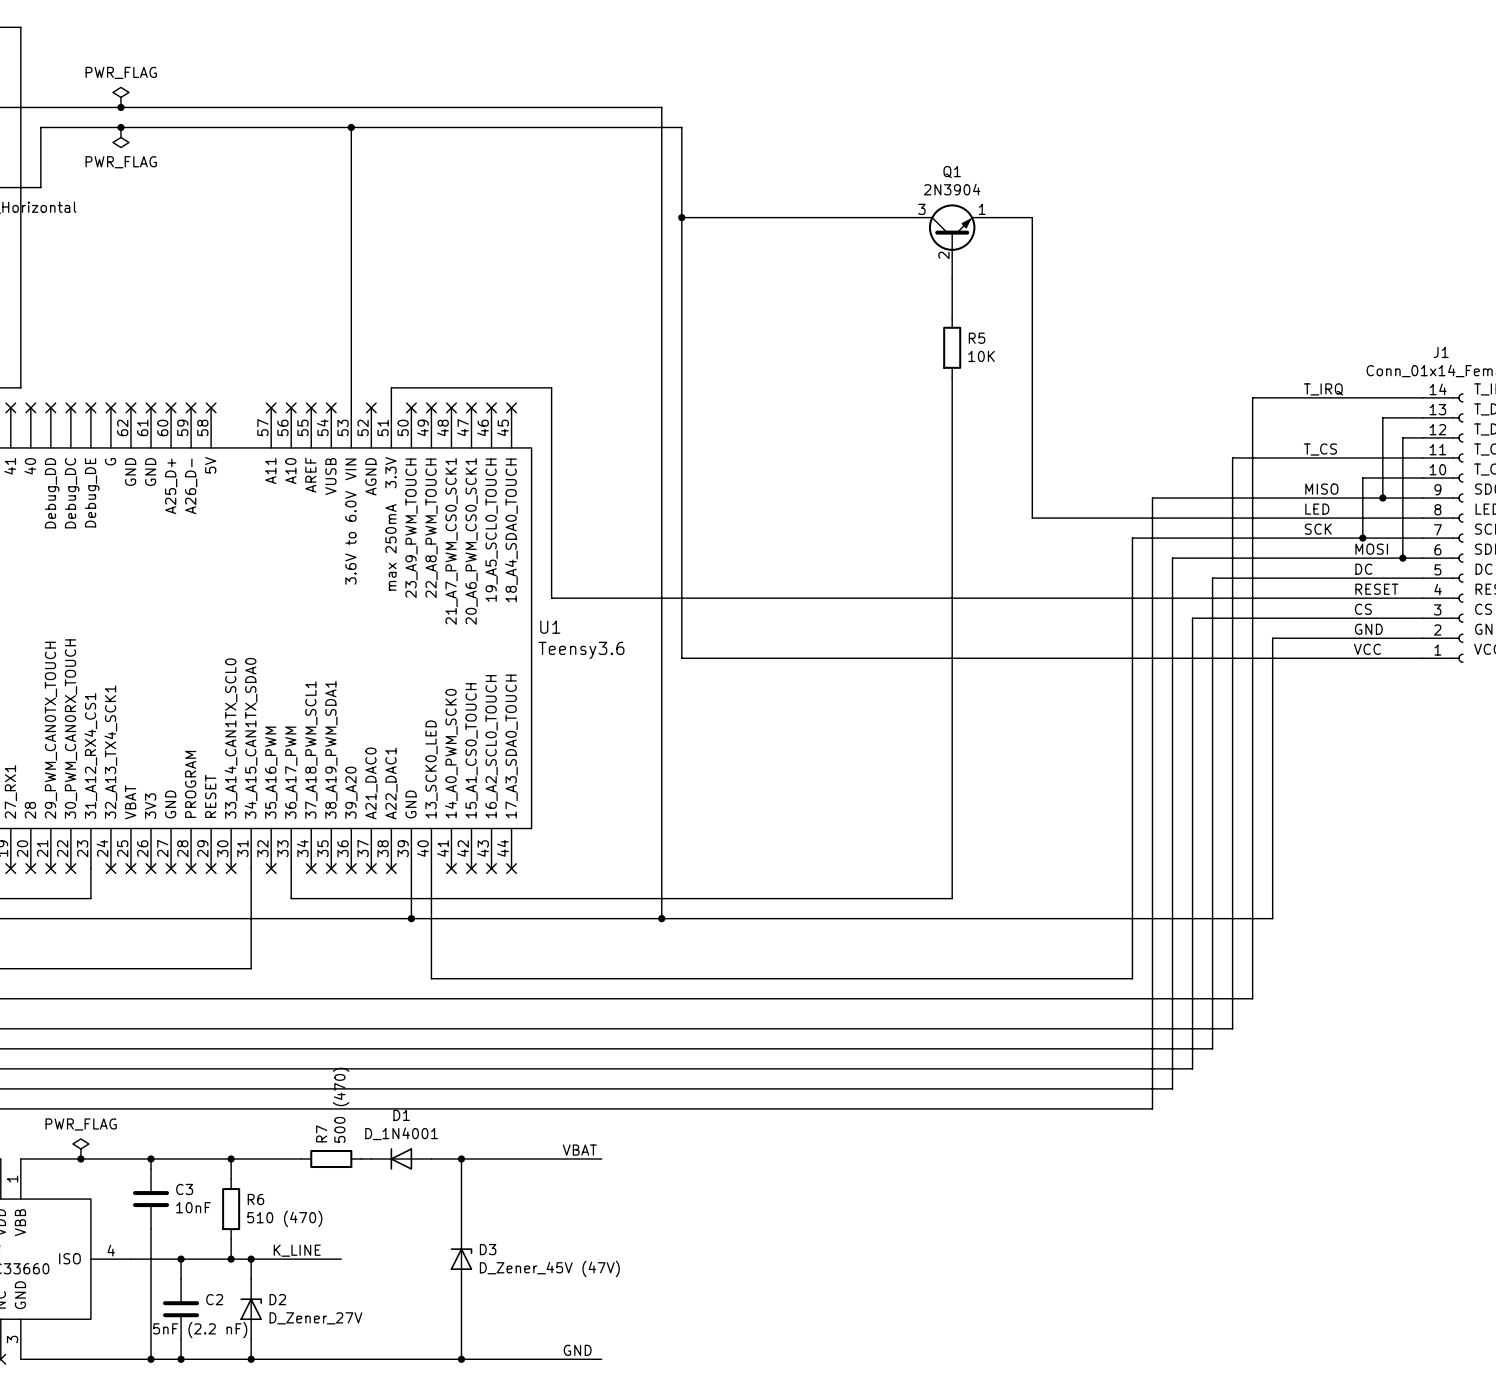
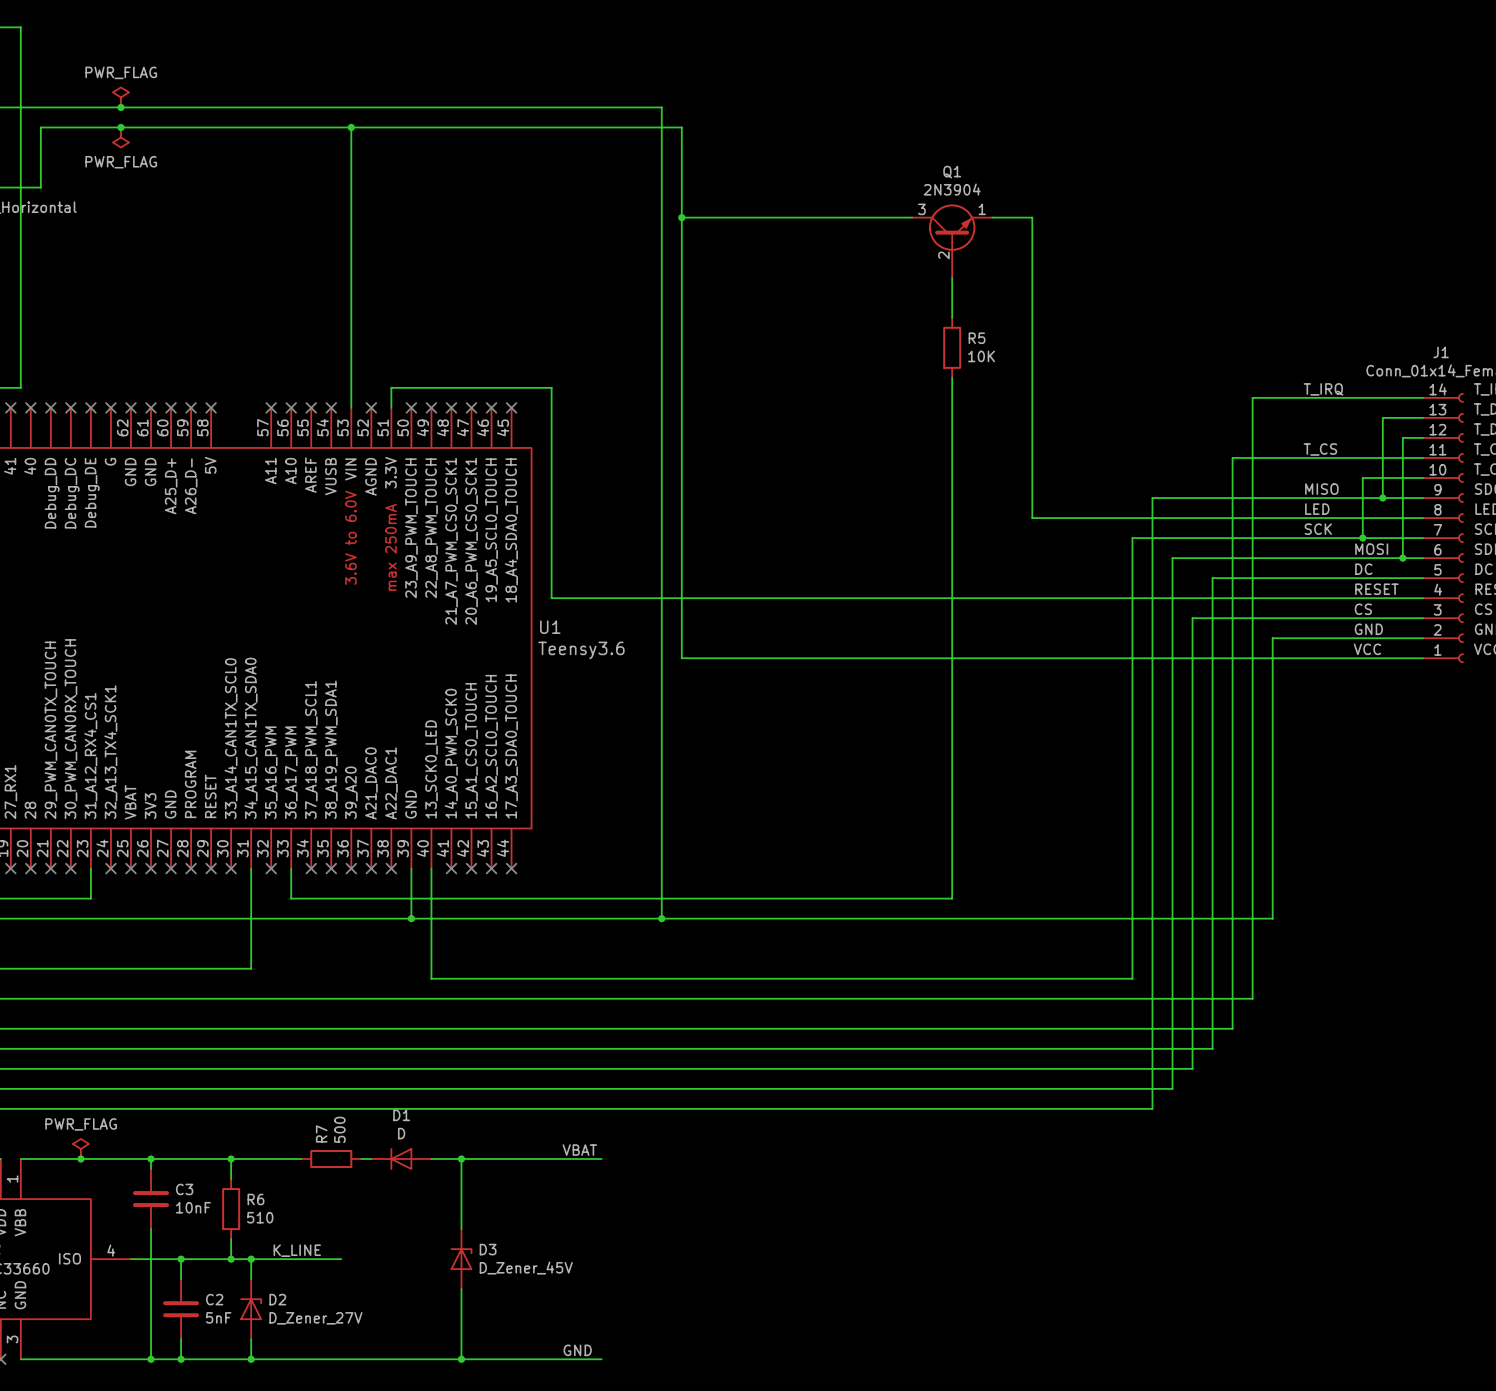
R7 value: 500 (470) (341, 1105) -> 500 (339, 1129)
D1 value: D_1N4001 (401, 1133) -> D (401, 1133)
R6 value: 510 (470) (284, 1218) -> 510 (260, 1217)
D3 value: D_Zener_45V (47V) (549, 1268) -> D_Zener_45V (526, 1268)
C2 value: 5nF (2.2 nF) (200, 1330) -> 5nF (218, 1317)

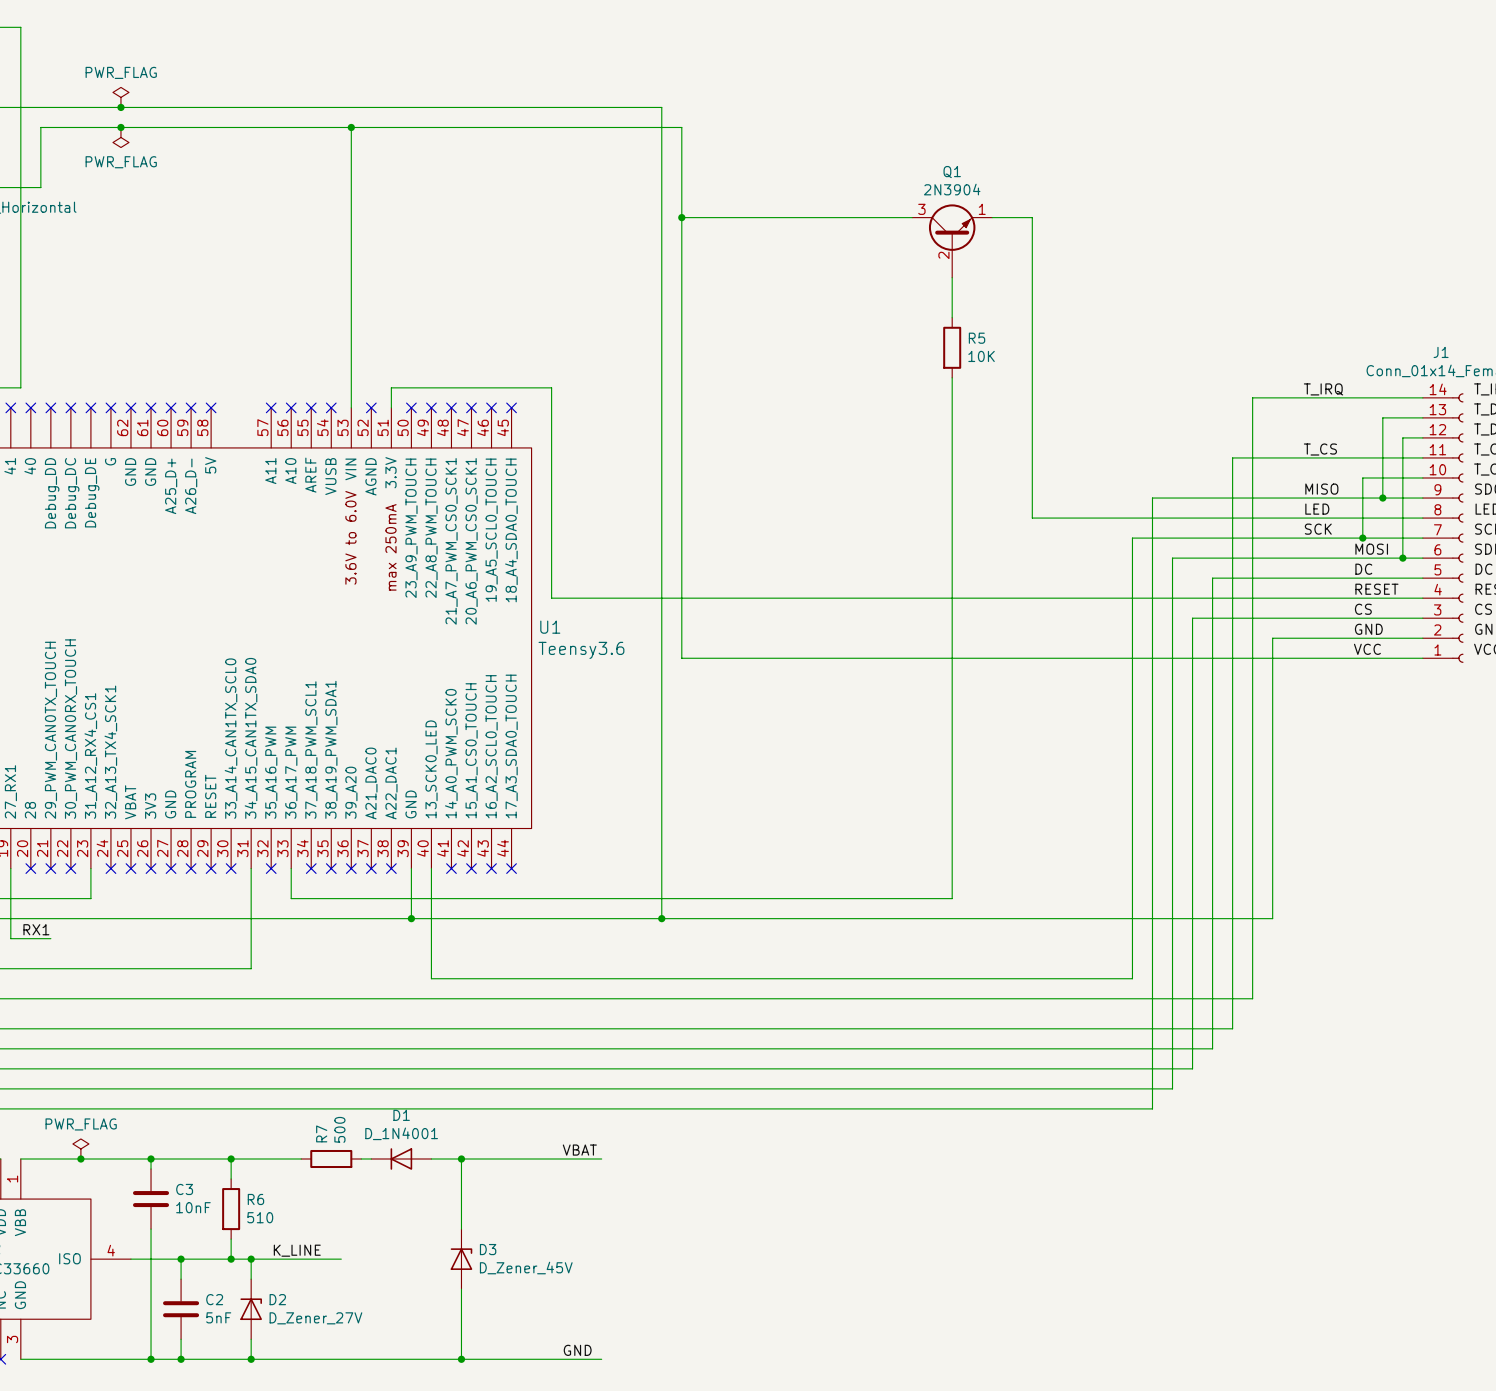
wire: none -> (10, 868) (10, 938) (50, 938)
no-connect mark: (10, 868) -> none
label: none -> RX1 (36, 929)
D1 value: D (401, 1133) -> D_1N4001 (401, 1133)

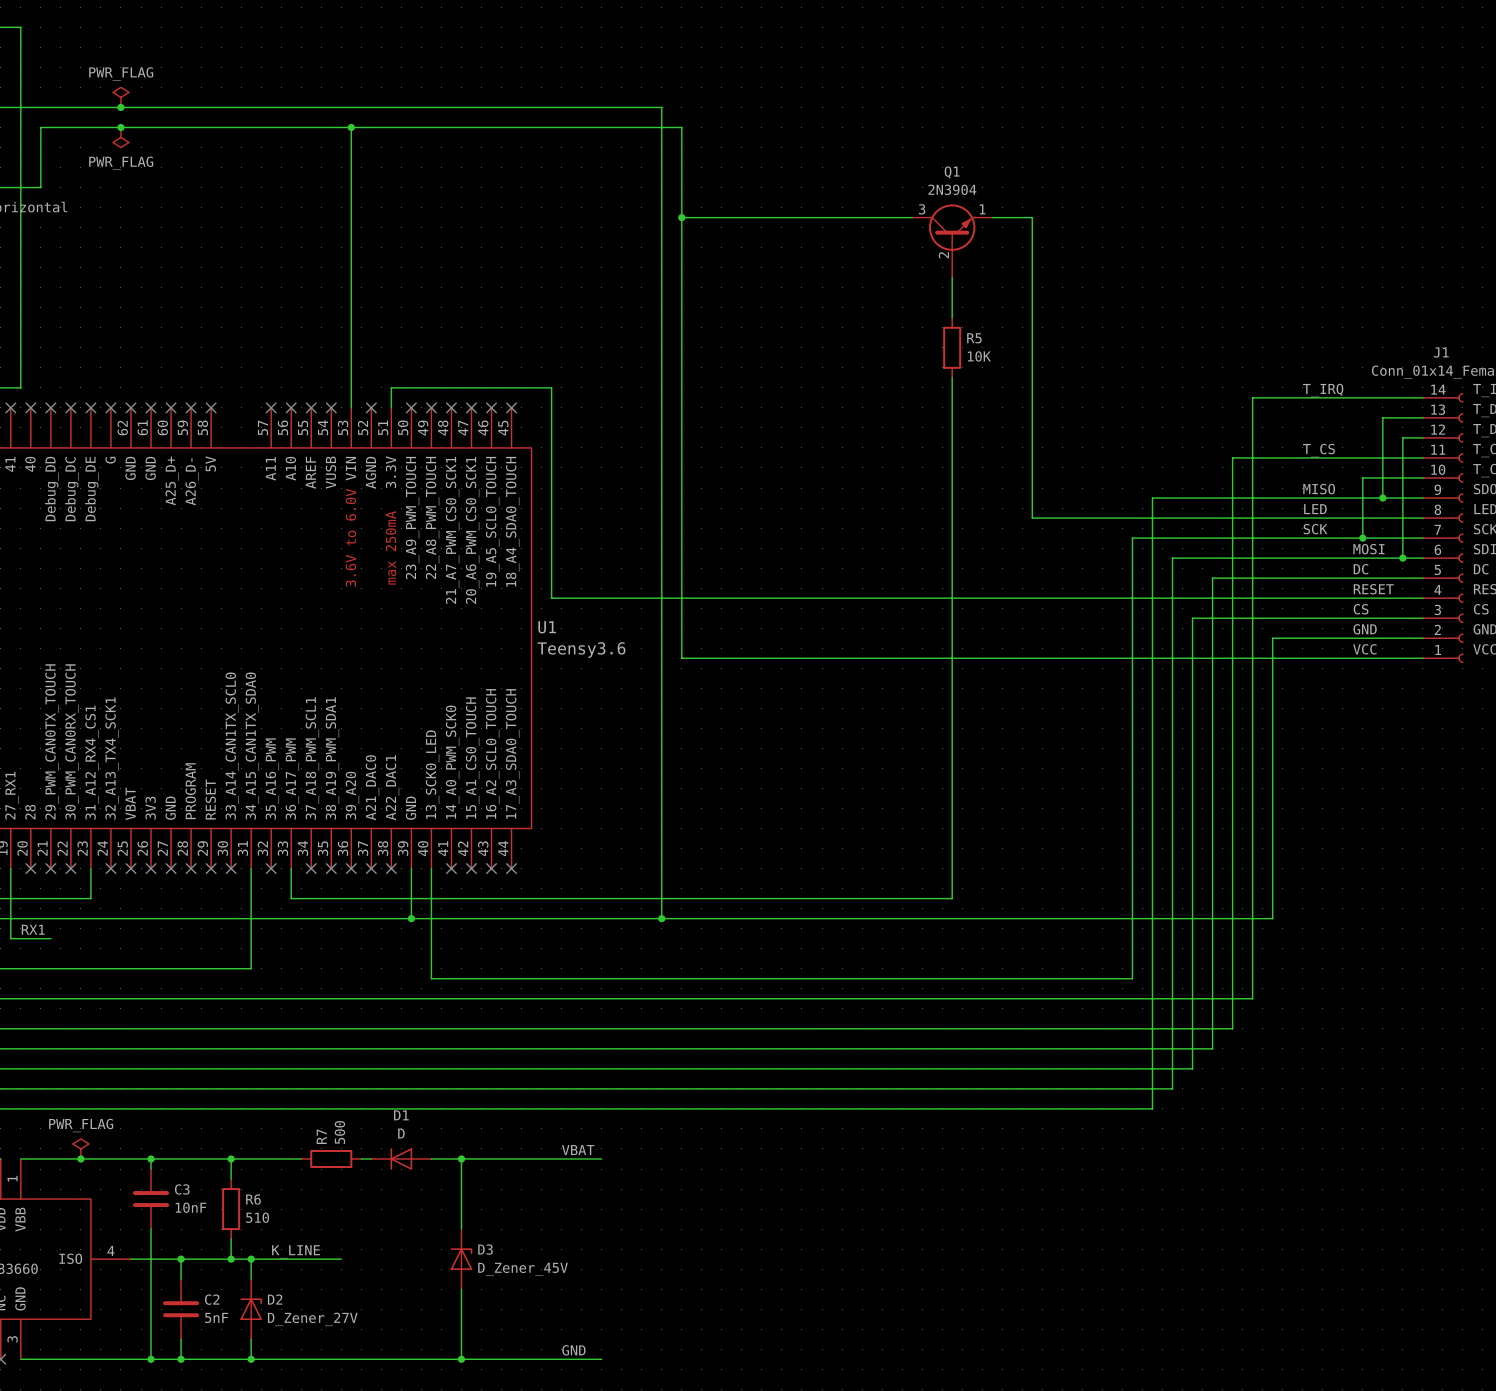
D1 value: D_1N4001 (401, 1133) -> D (401, 1133)

